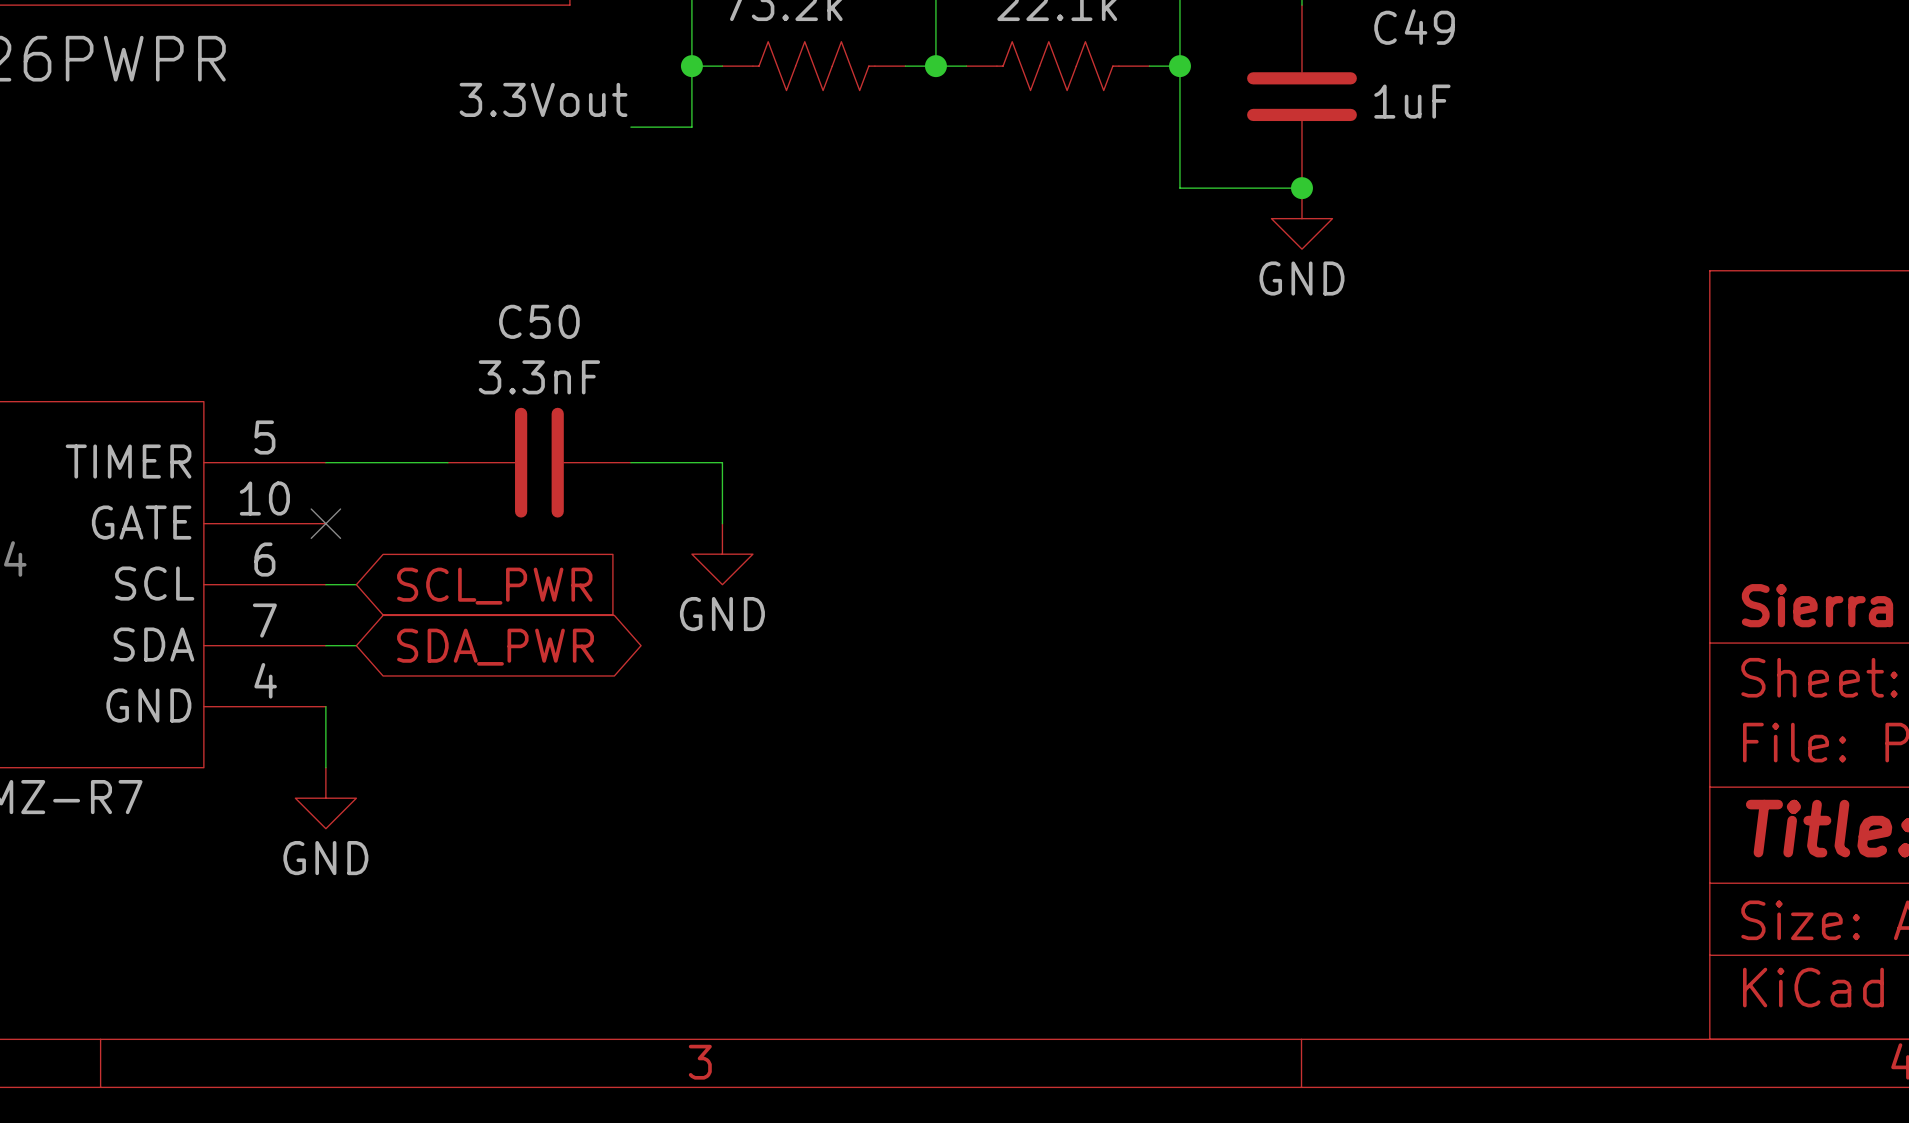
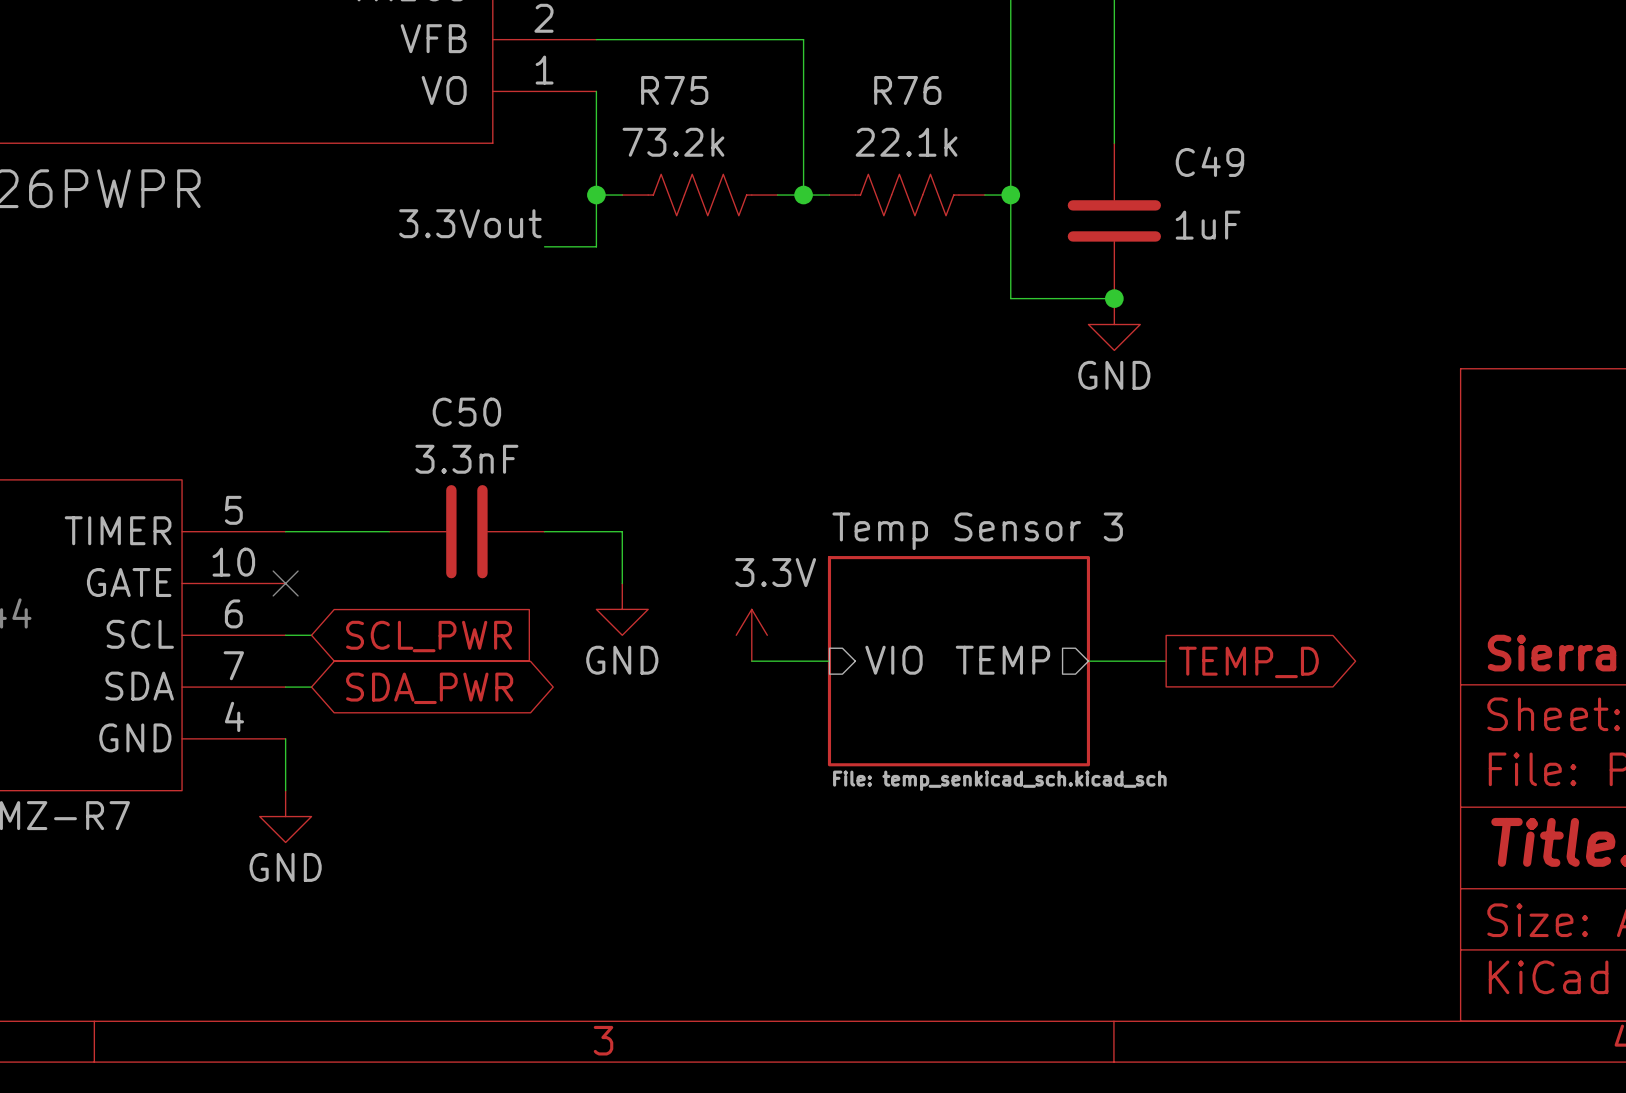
power symbol: none -> 3.3V (751, 635)
sheet pin: none -> VIO (894, 660)
sheet pin: none -> TEMP (1002, 660)
wire: none -> (751, 661) (829, 661)
sheet Temp Sensor 3: none -> File: temp_senkicad_sch.kicad_sch (958, 661)
wire: none -> (1088, 661) (1166, 661)
global label: none -> TEMP_D (1248, 662)

